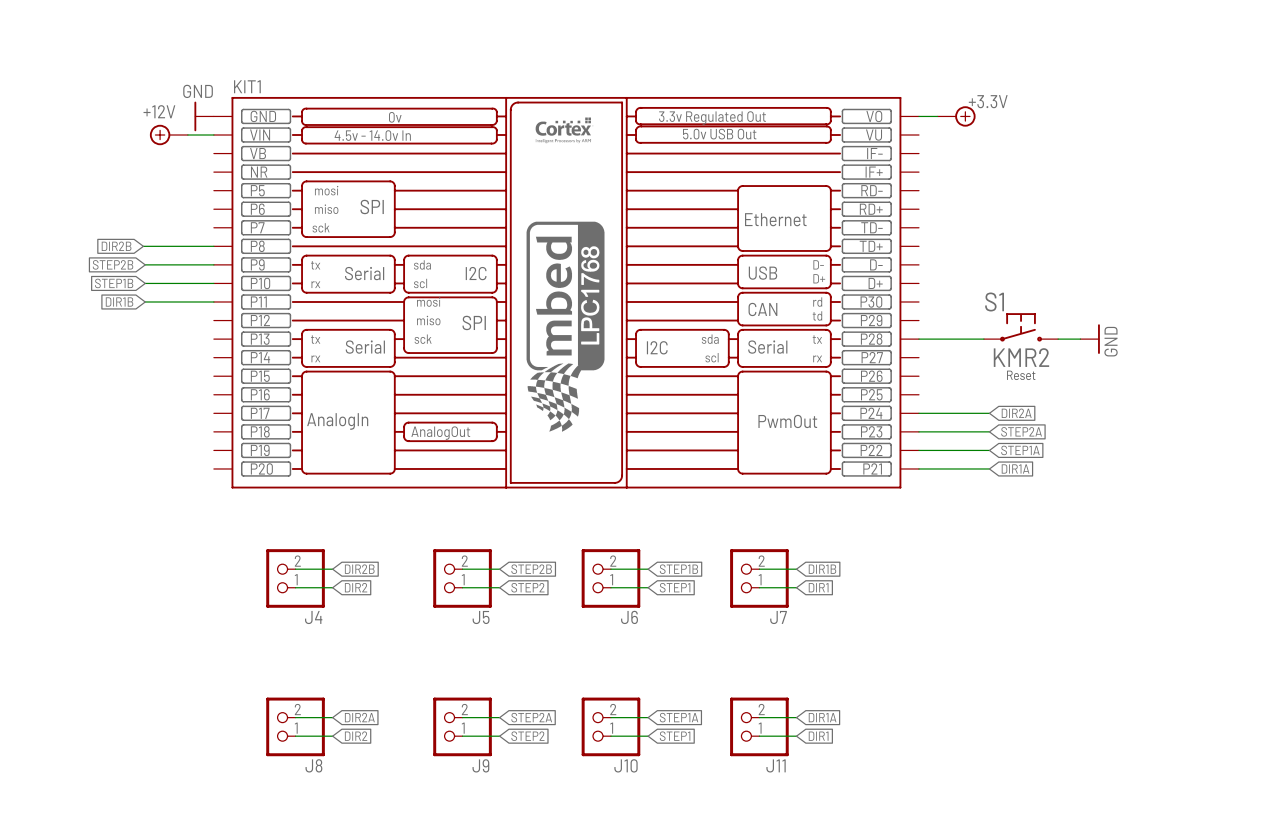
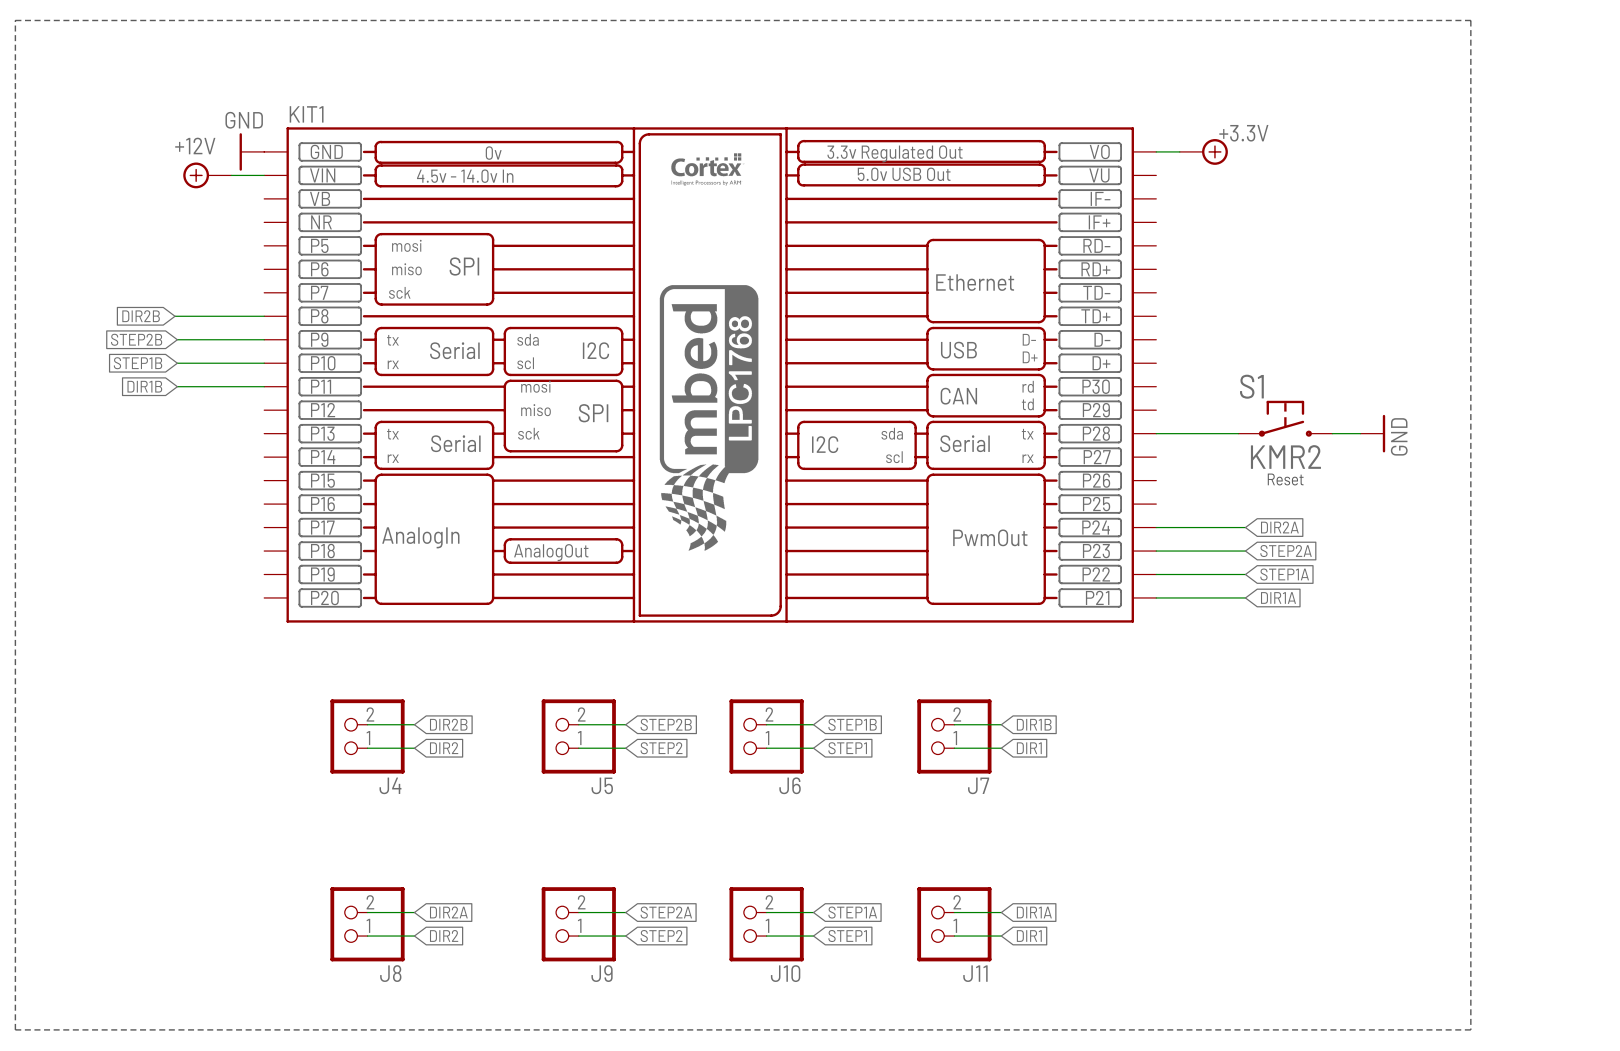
line: none -> (15, 20) (1470, 20) (1470, 1029) (15, 1029) (15, 20)

